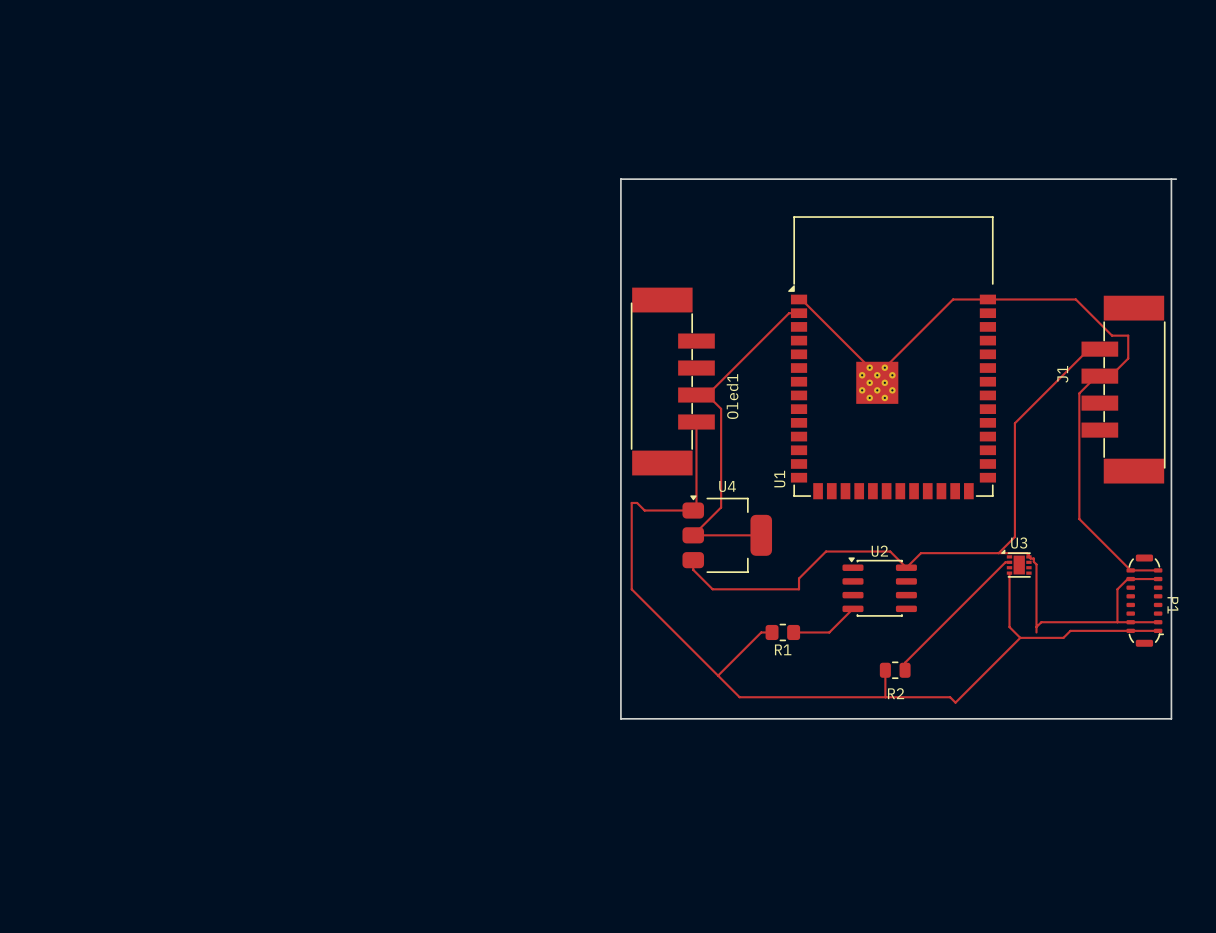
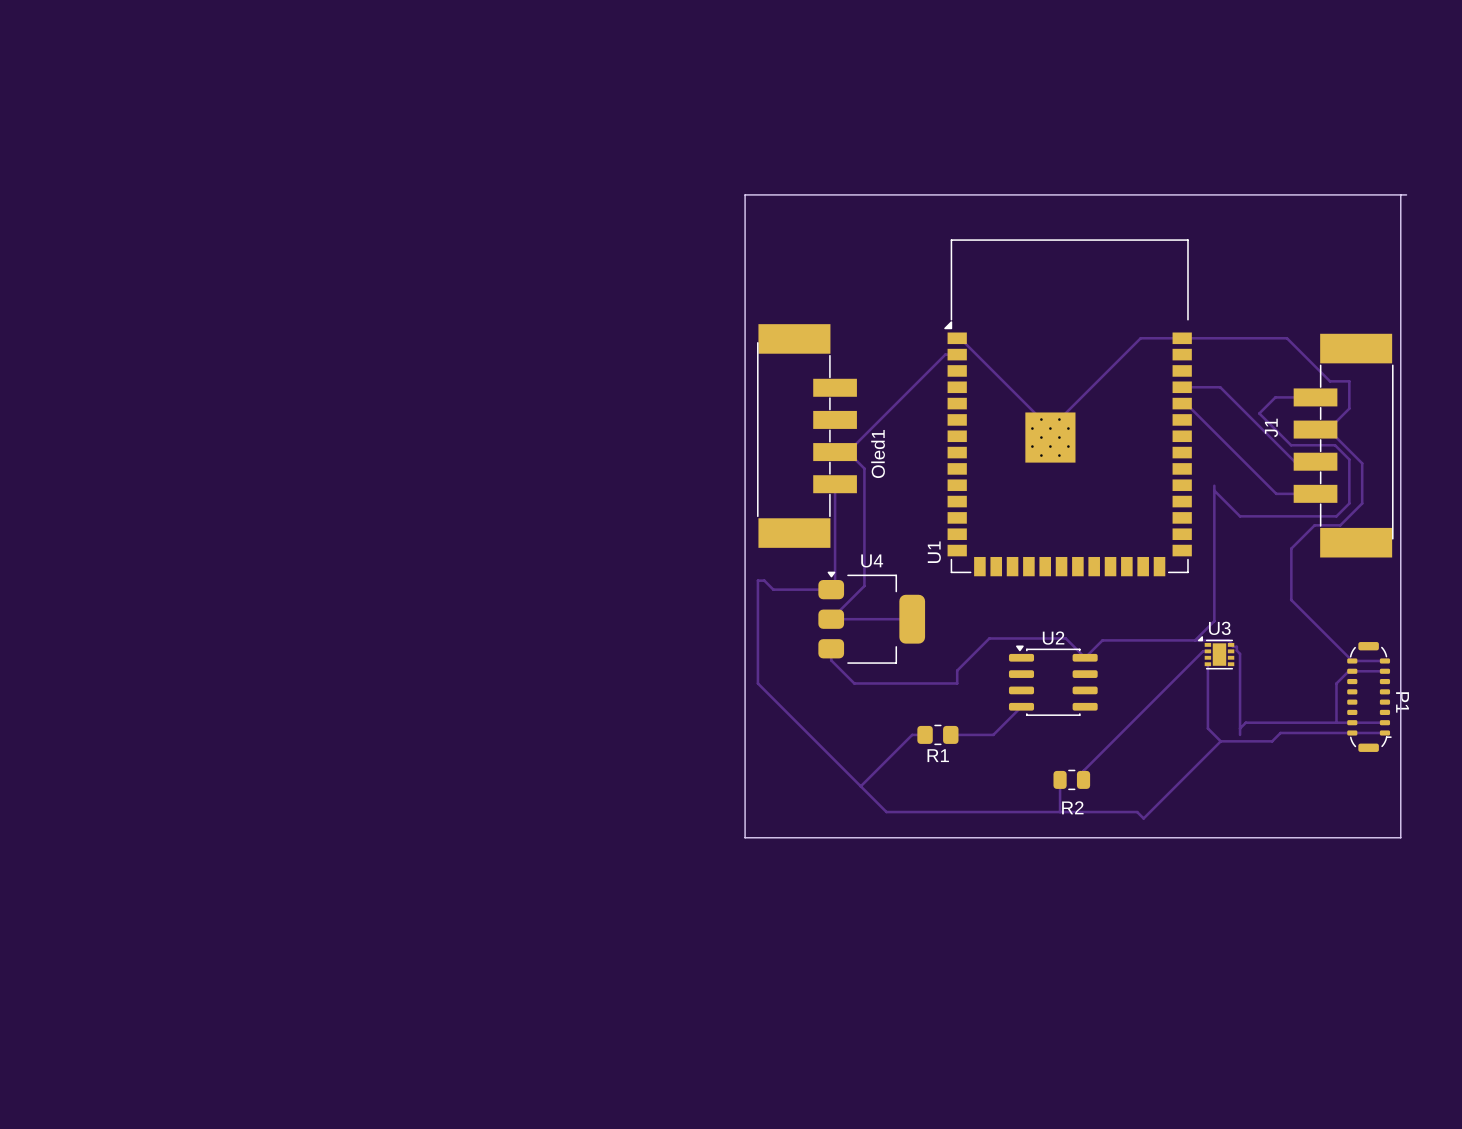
track: none -> (1182, 387) (1220, 387) (1294, 461) (1315, 461)
track: (1089, 349) (1014, 423) -> (1302, 397) (1275, 397) (1259, 413) (1291, 445) (1335, 445) (1349, 459) (1349, 503) (1336, 516) (1240, 516) (1214, 490)
track: none -> (1182, 403) (1186, 403) (1276, 493) (1315, 493)
track: (1096, 376) (1079, 393) (1079, 519) -> (1328, 429) (1362, 463) (1362, 503) (1340, 525) (1314, 525) (1291, 548) (1291, 600)

